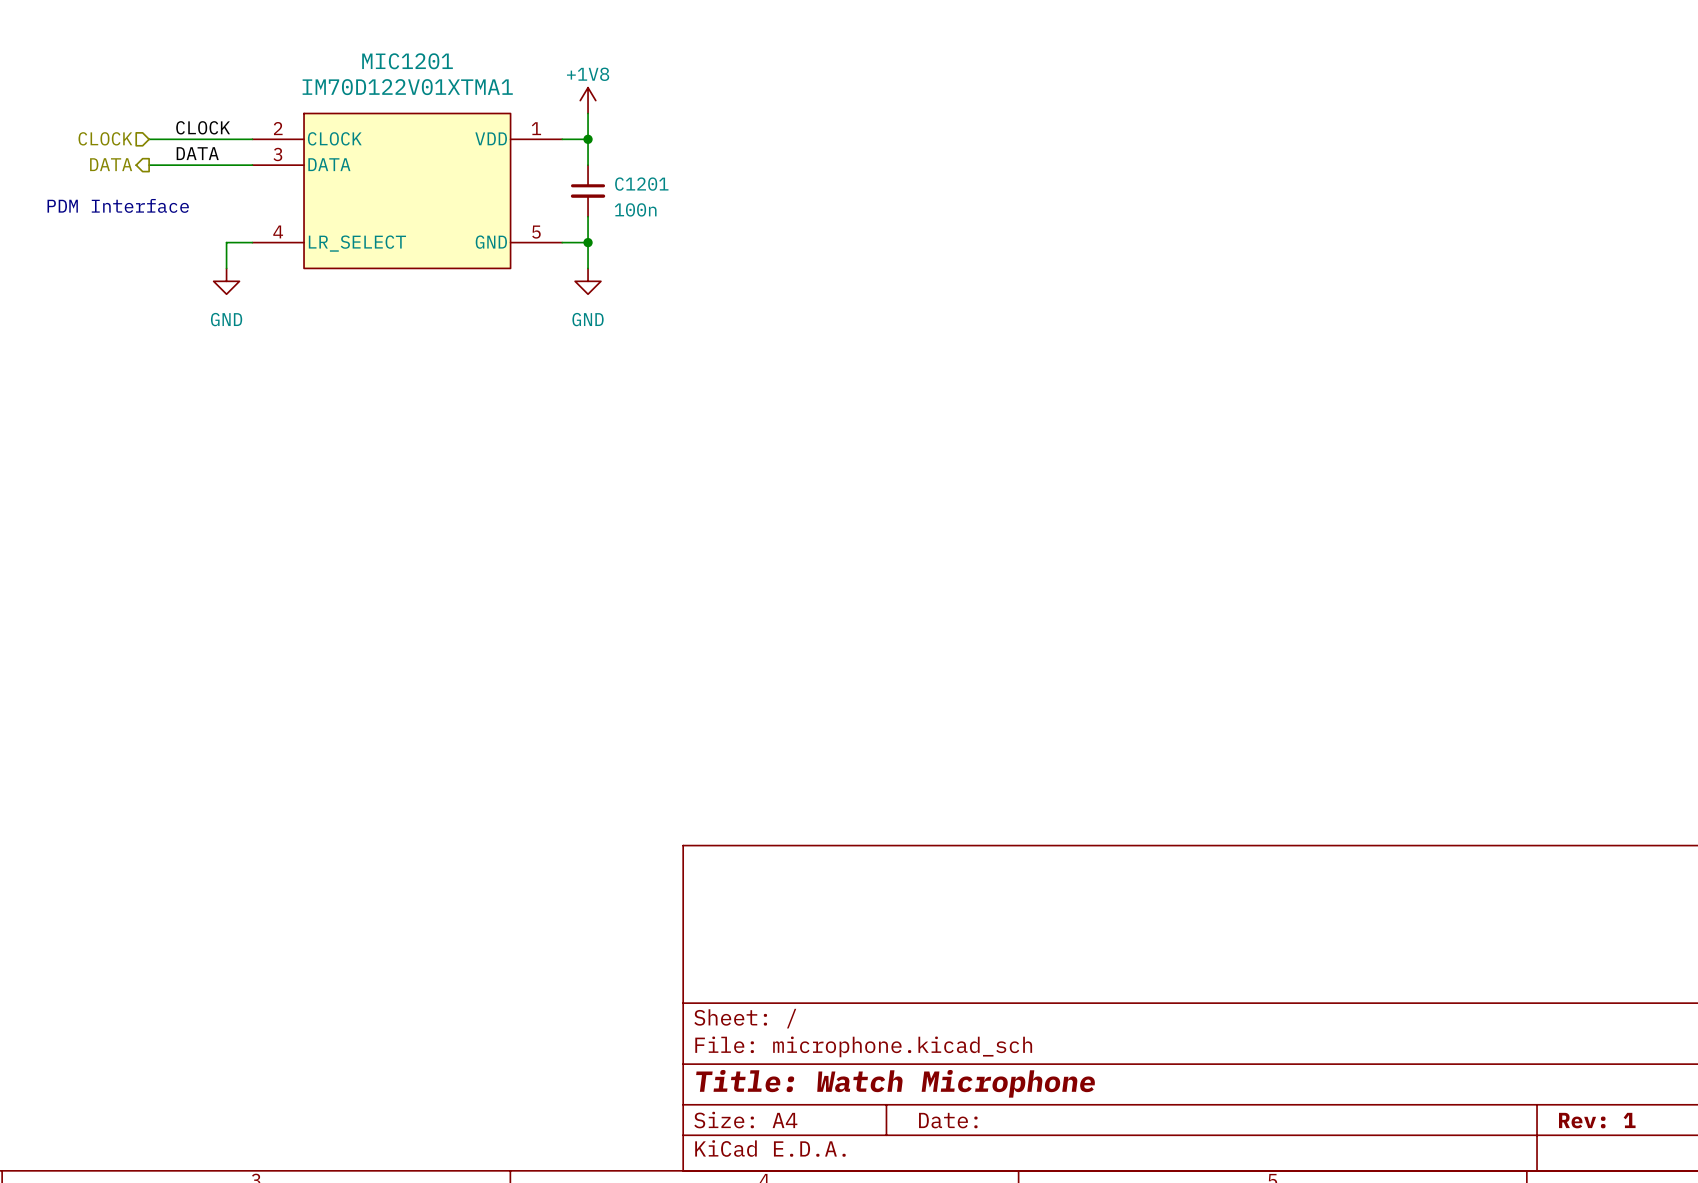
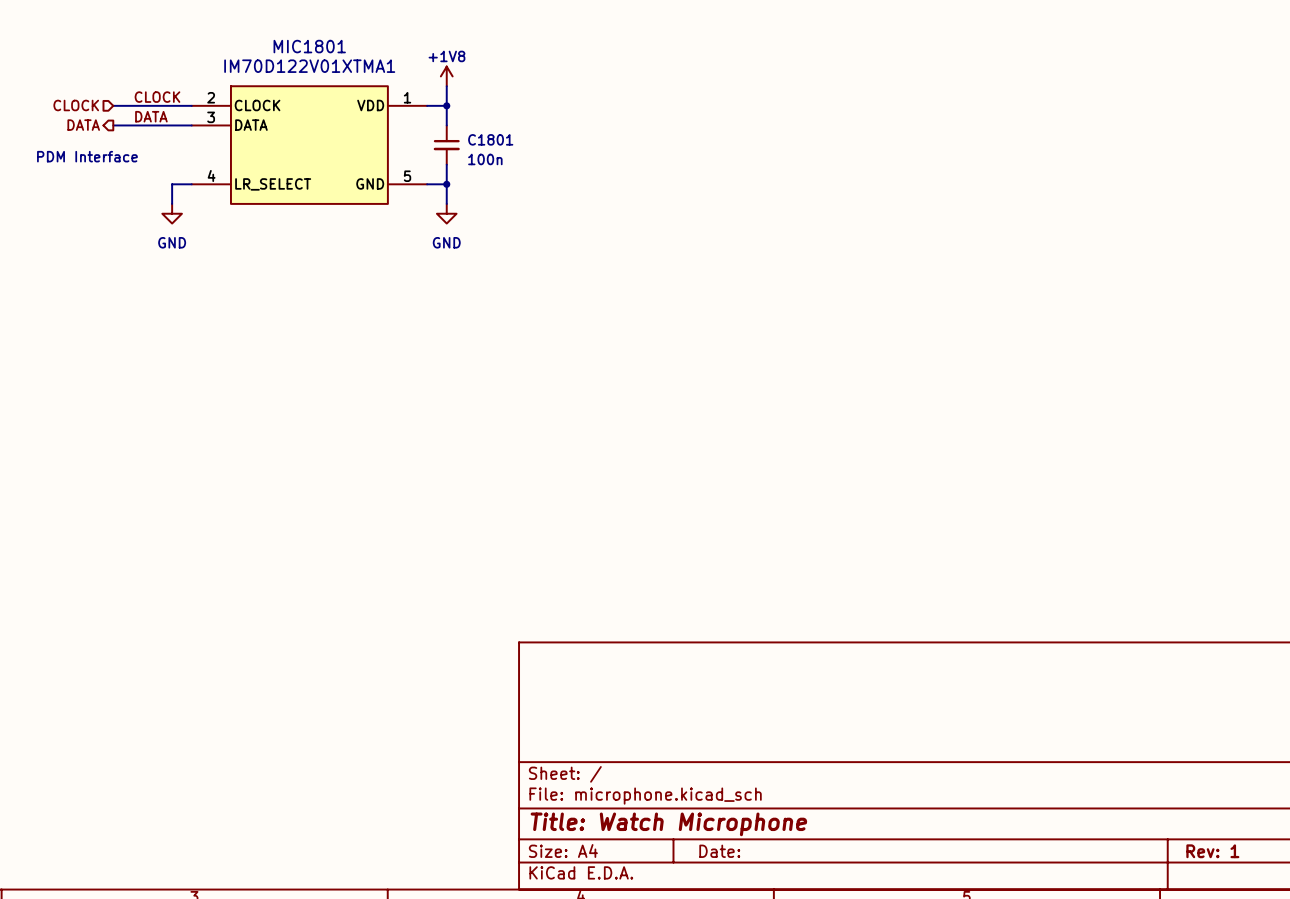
MIC1201 name: MIC1201 (407, 61) -> MIC1801 (309, 46)
C1201 name: C1201 (641, 184) -> C1801 (490, 139)

